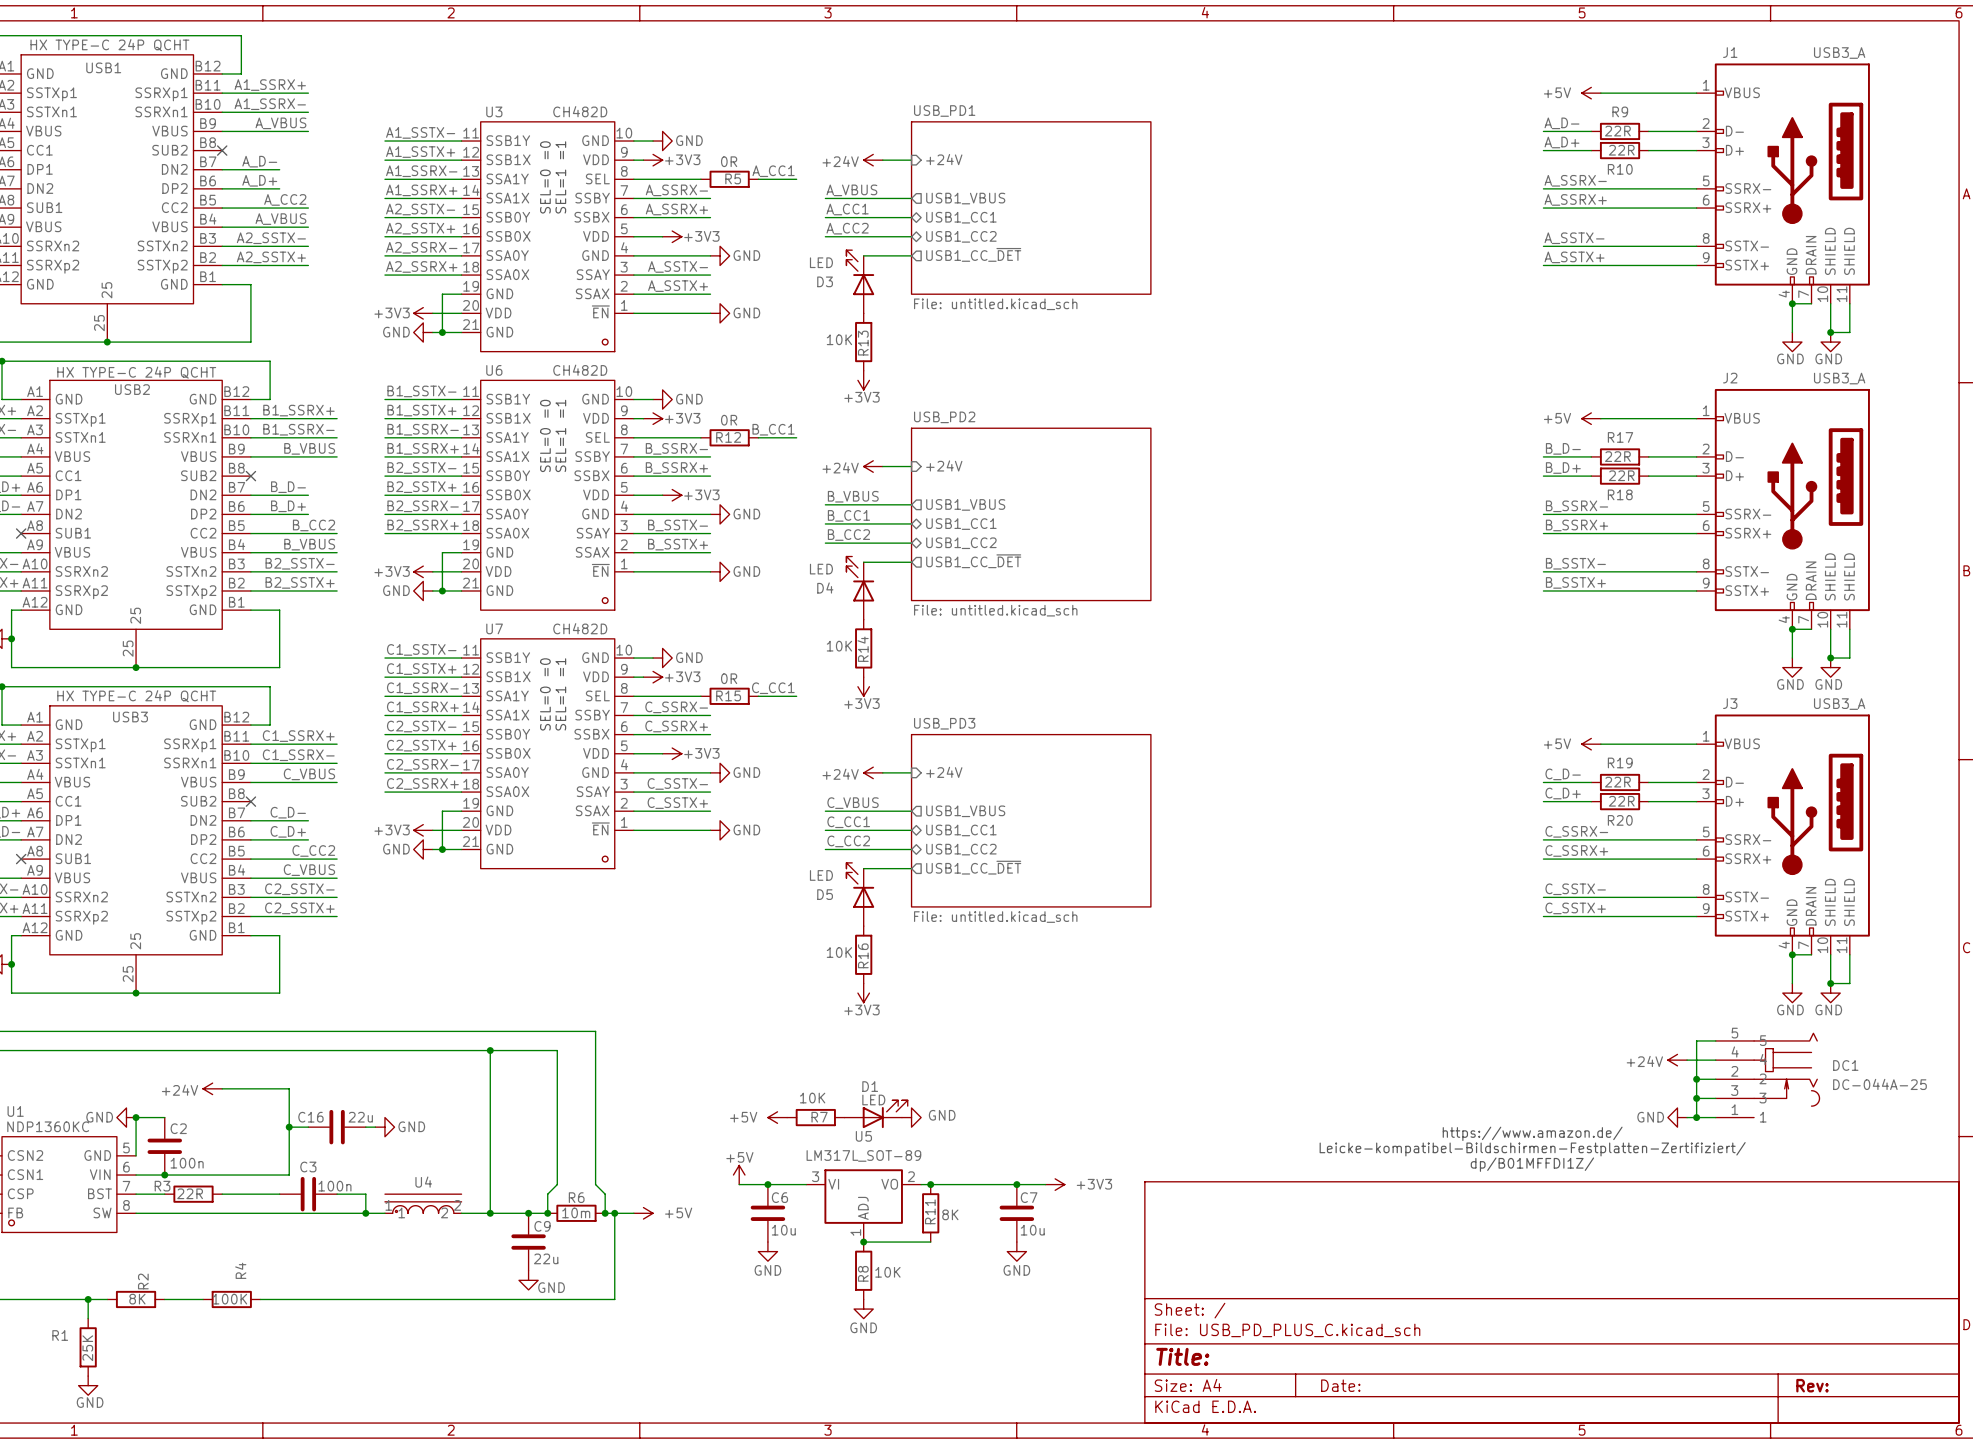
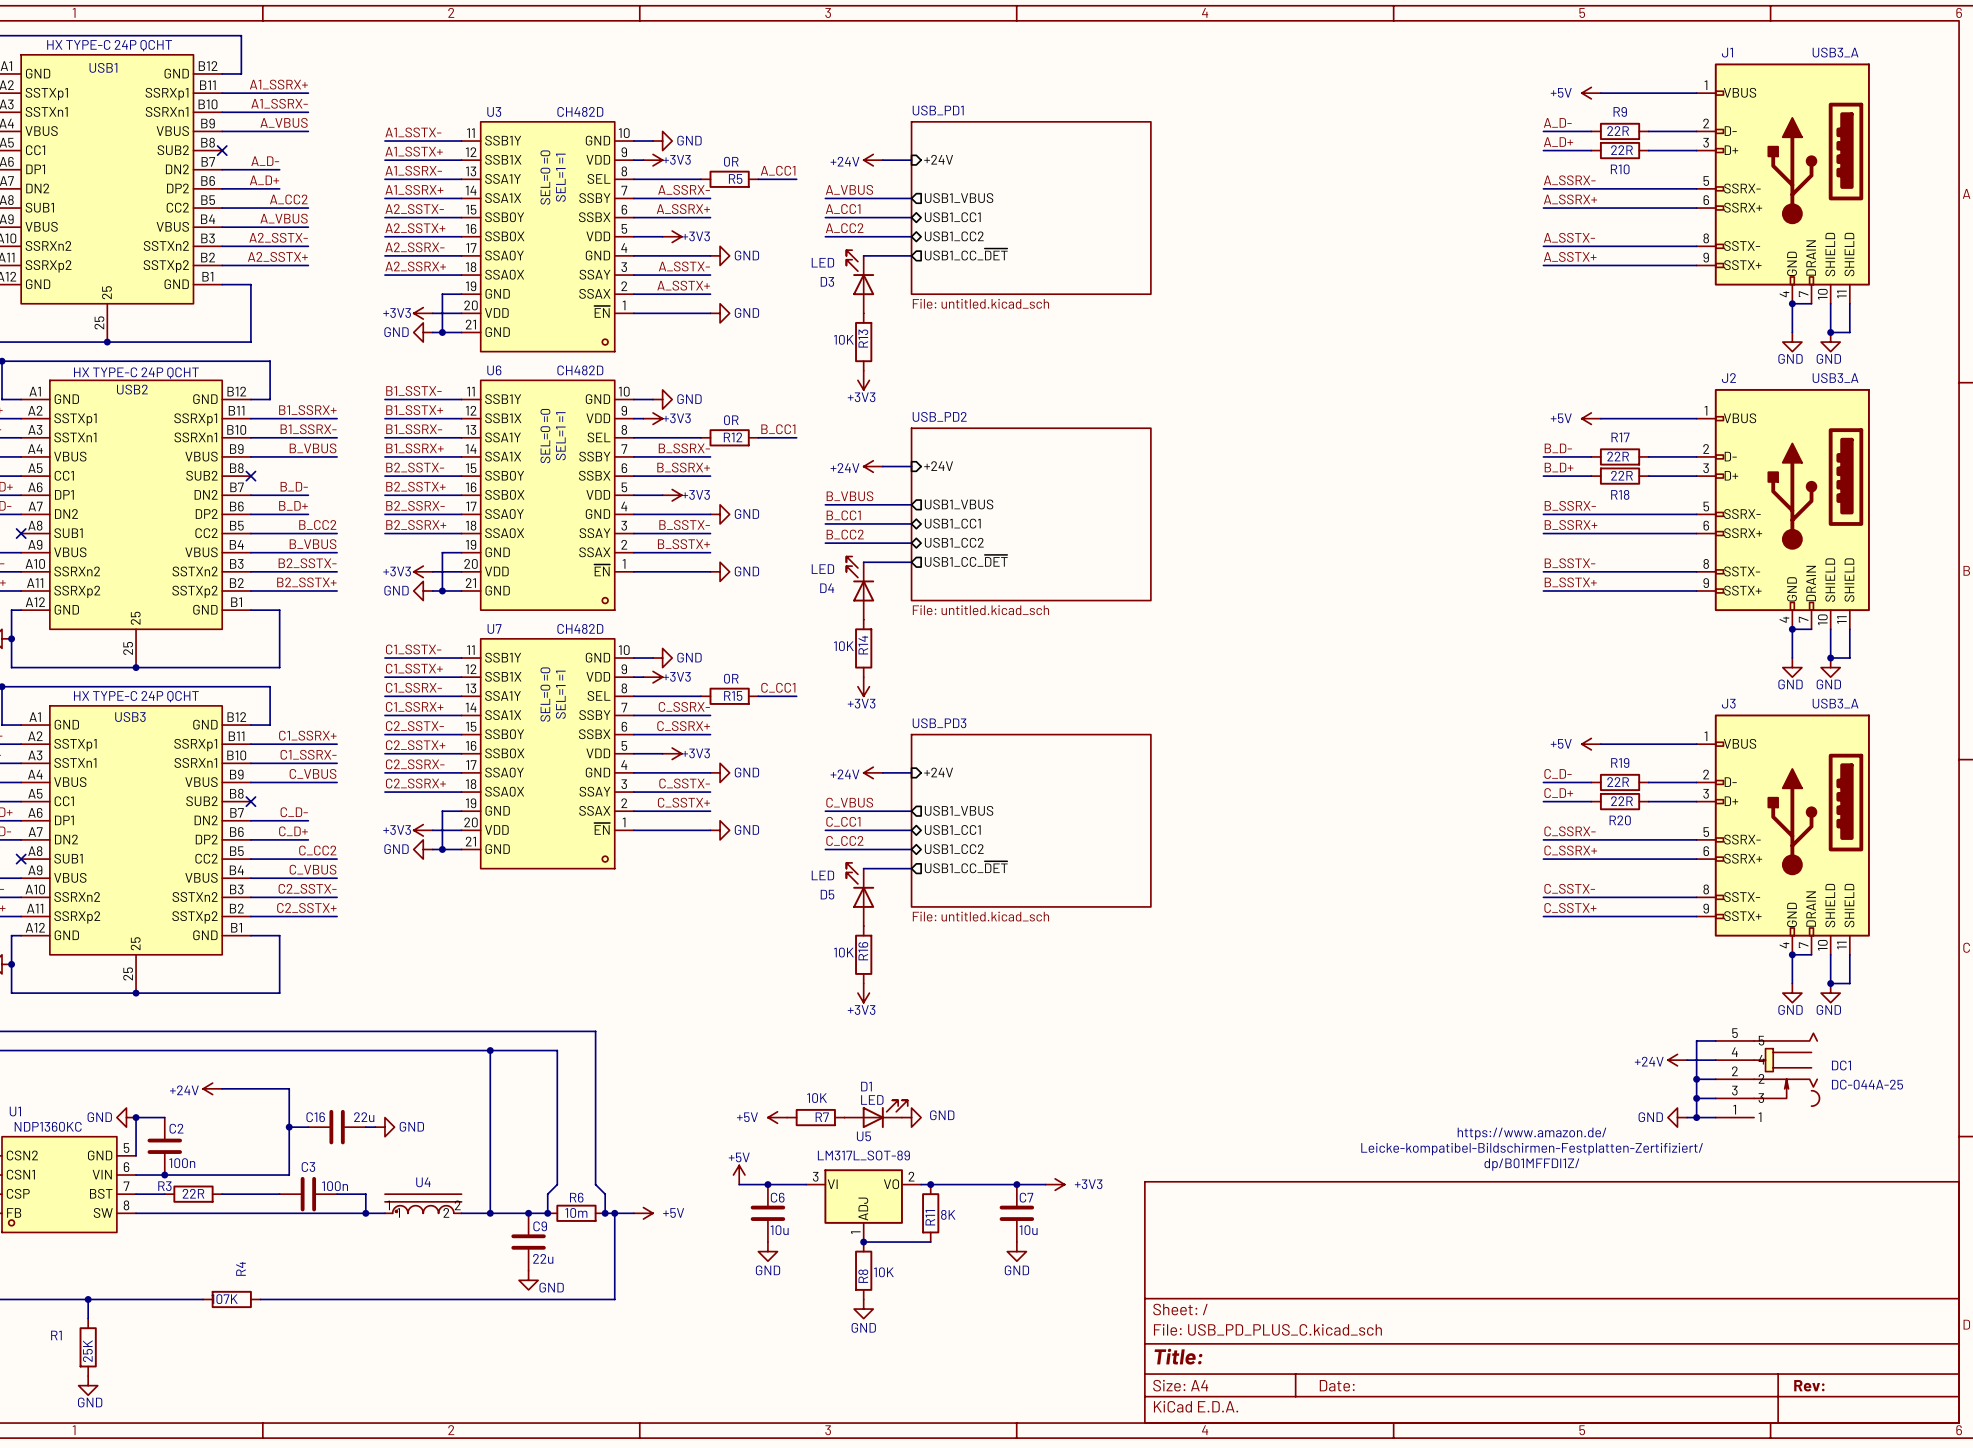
wire: none -> (107, 1299) (164, 1299)
R2: 8K (136, 1299) -> none
R4 value: 100K (229, 1299) -> 107K (224, 1299)

